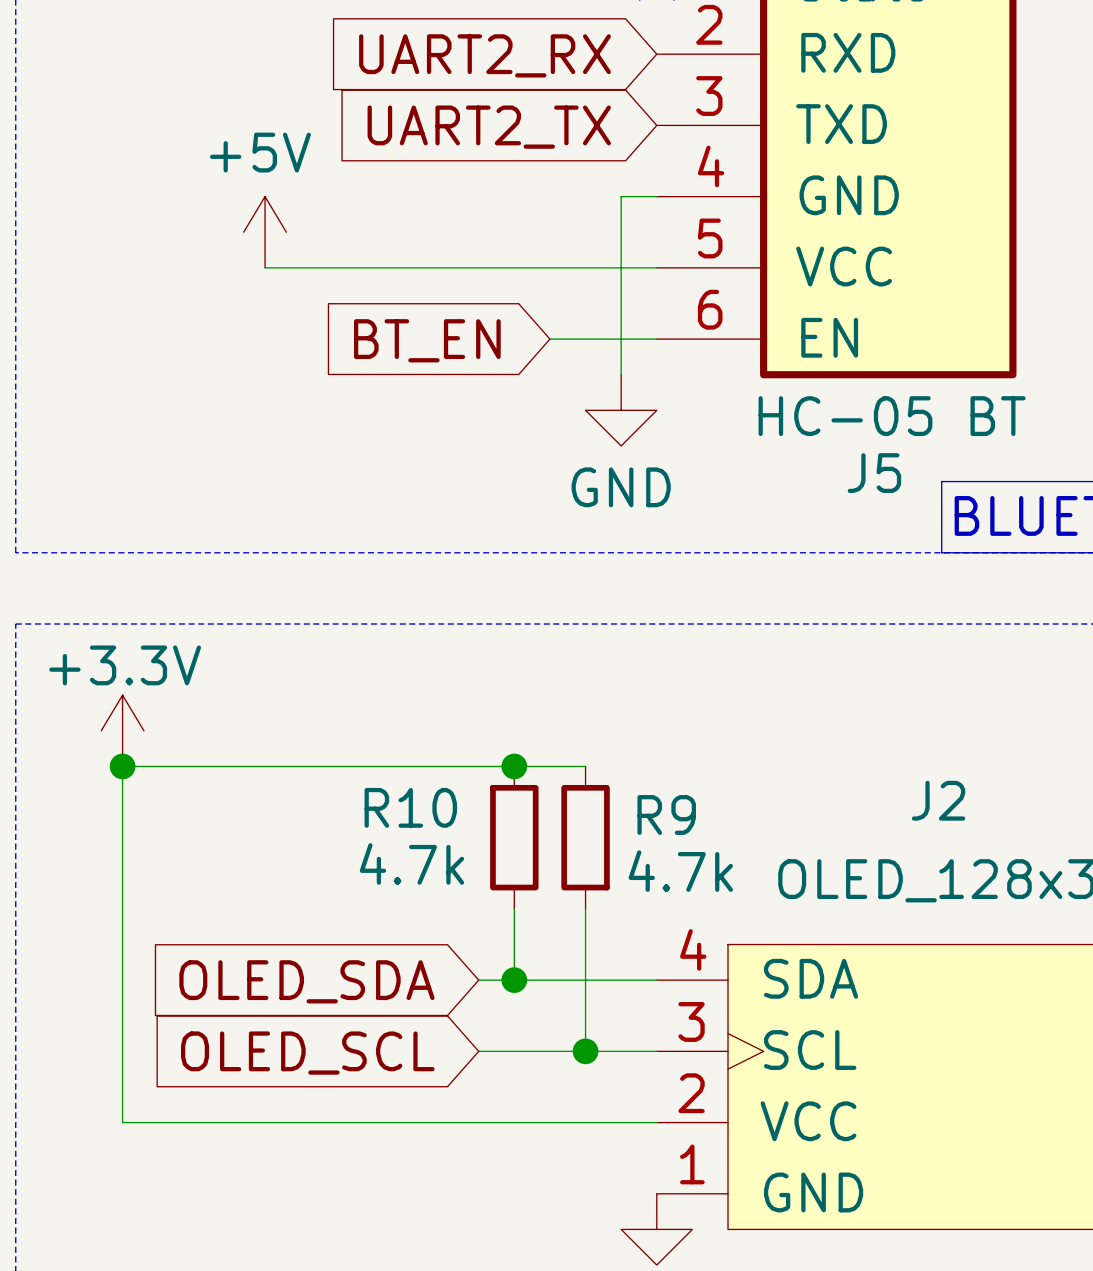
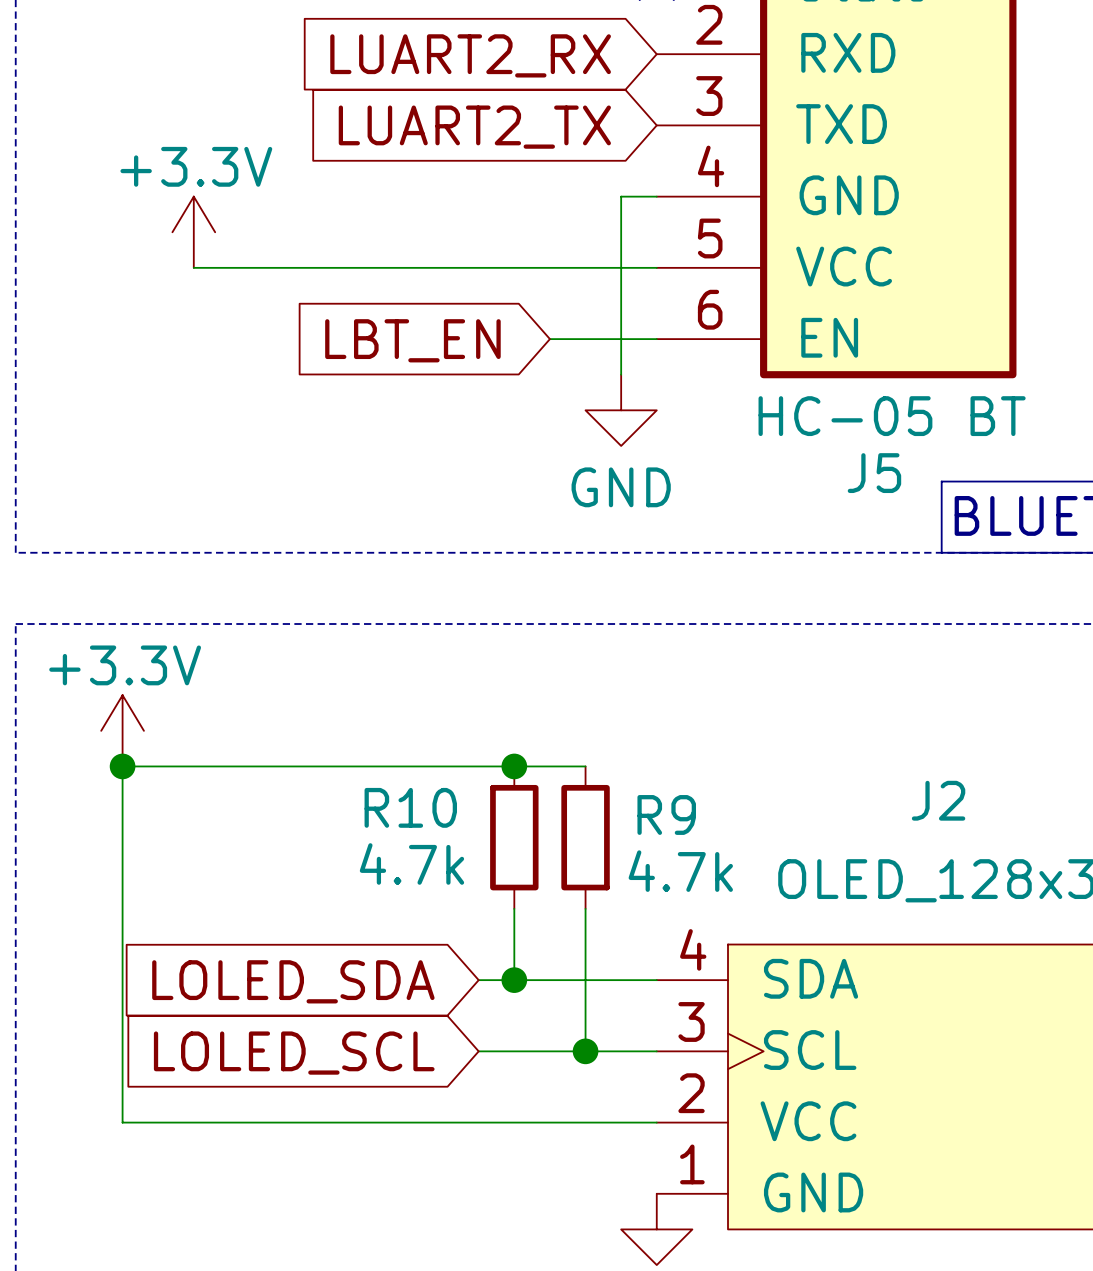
global label: UART2_RX (485, 55) -> LUART2_RX (470, 55)
global label: UART2_TX (489, 127) -> LUART2_TX (474, 127)
power symbol: none -> +3.3V (193, 232)
power symbol: +5V (265, 232) -> none
wire: none -> (193, 267) (265, 267)
global label: BT_EN (427, 340) -> LBT_EN (412, 340)
global label: OLED_SDA (306, 981) -> LOLED_SDA (293, 981)
global label: OLED_SCL (307, 1053) -> LOLED_SCL (294, 1053)

